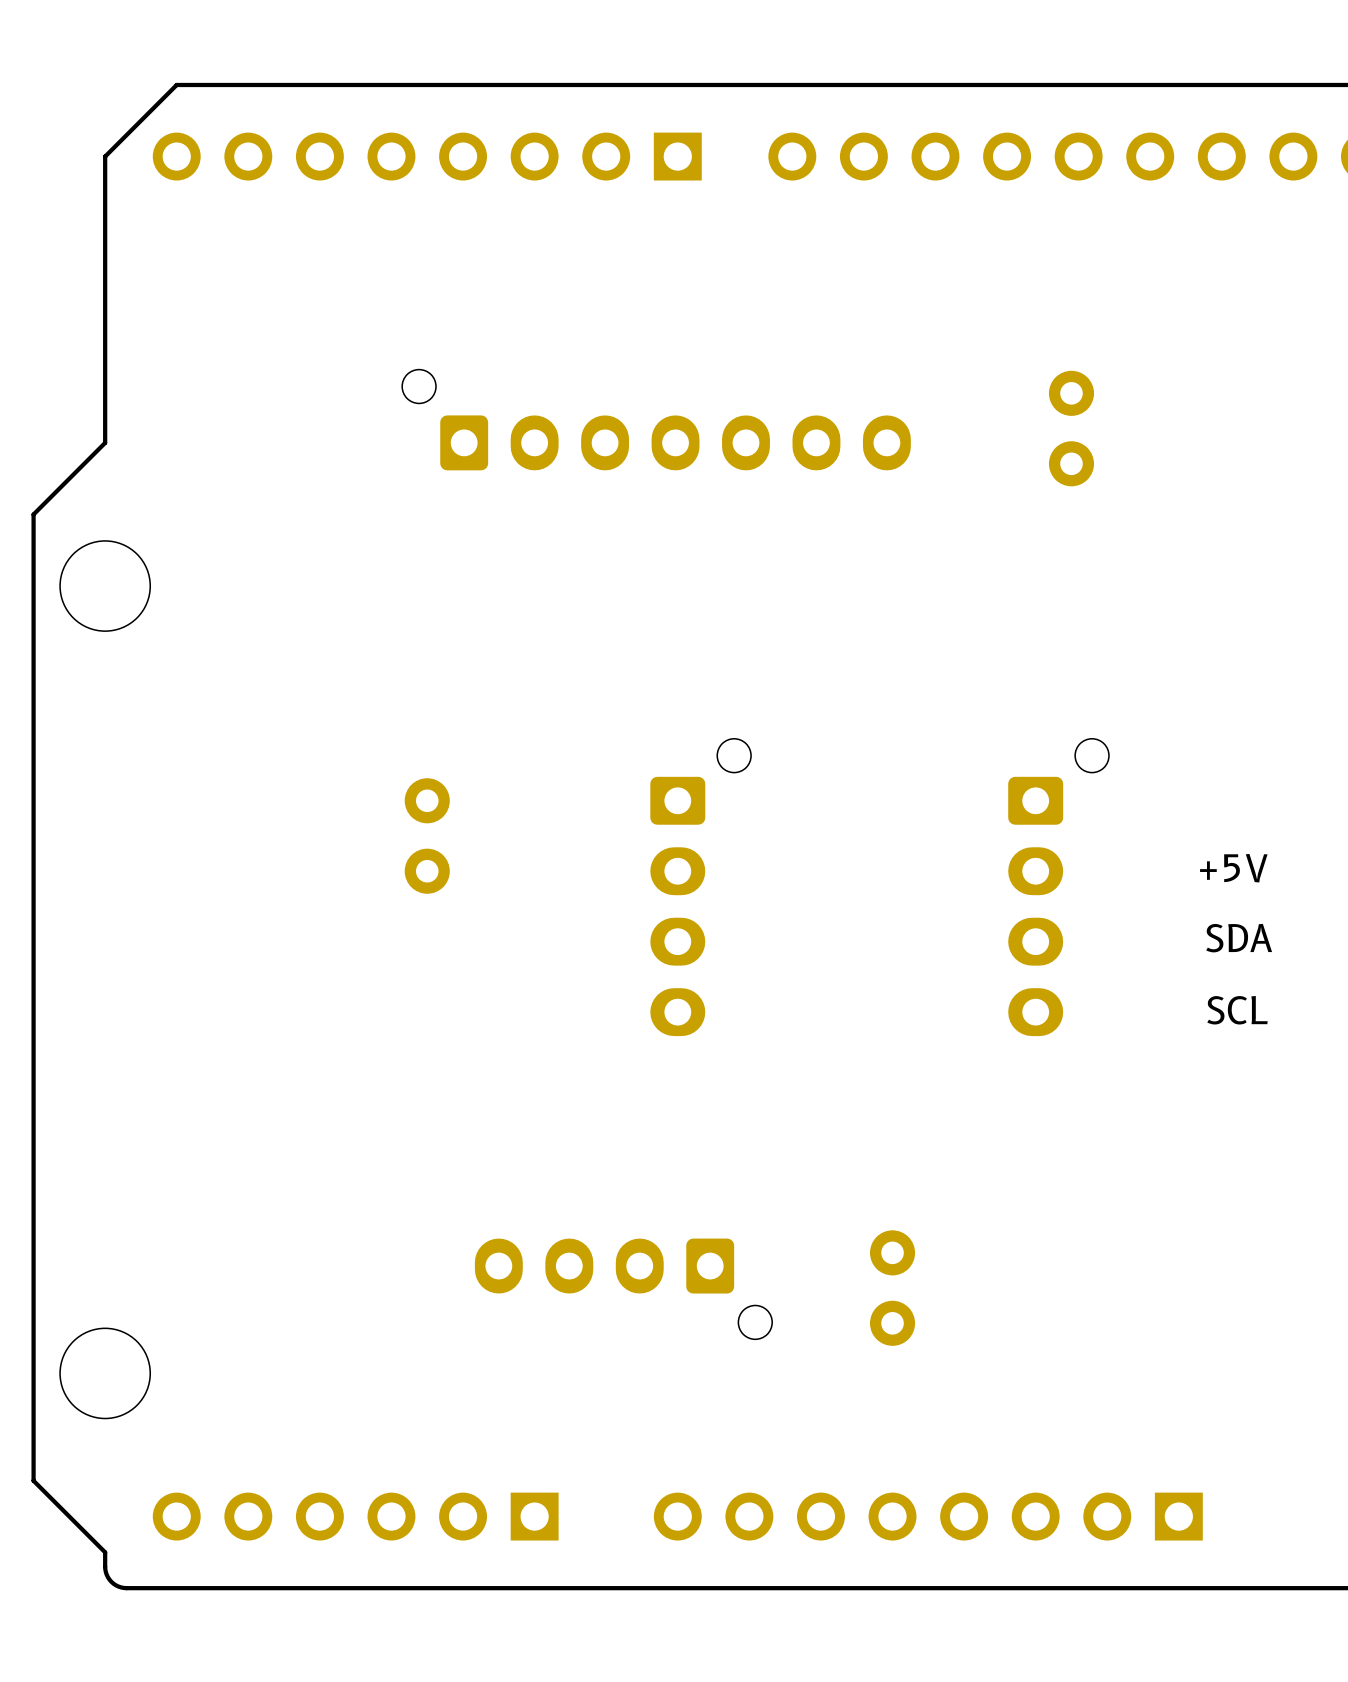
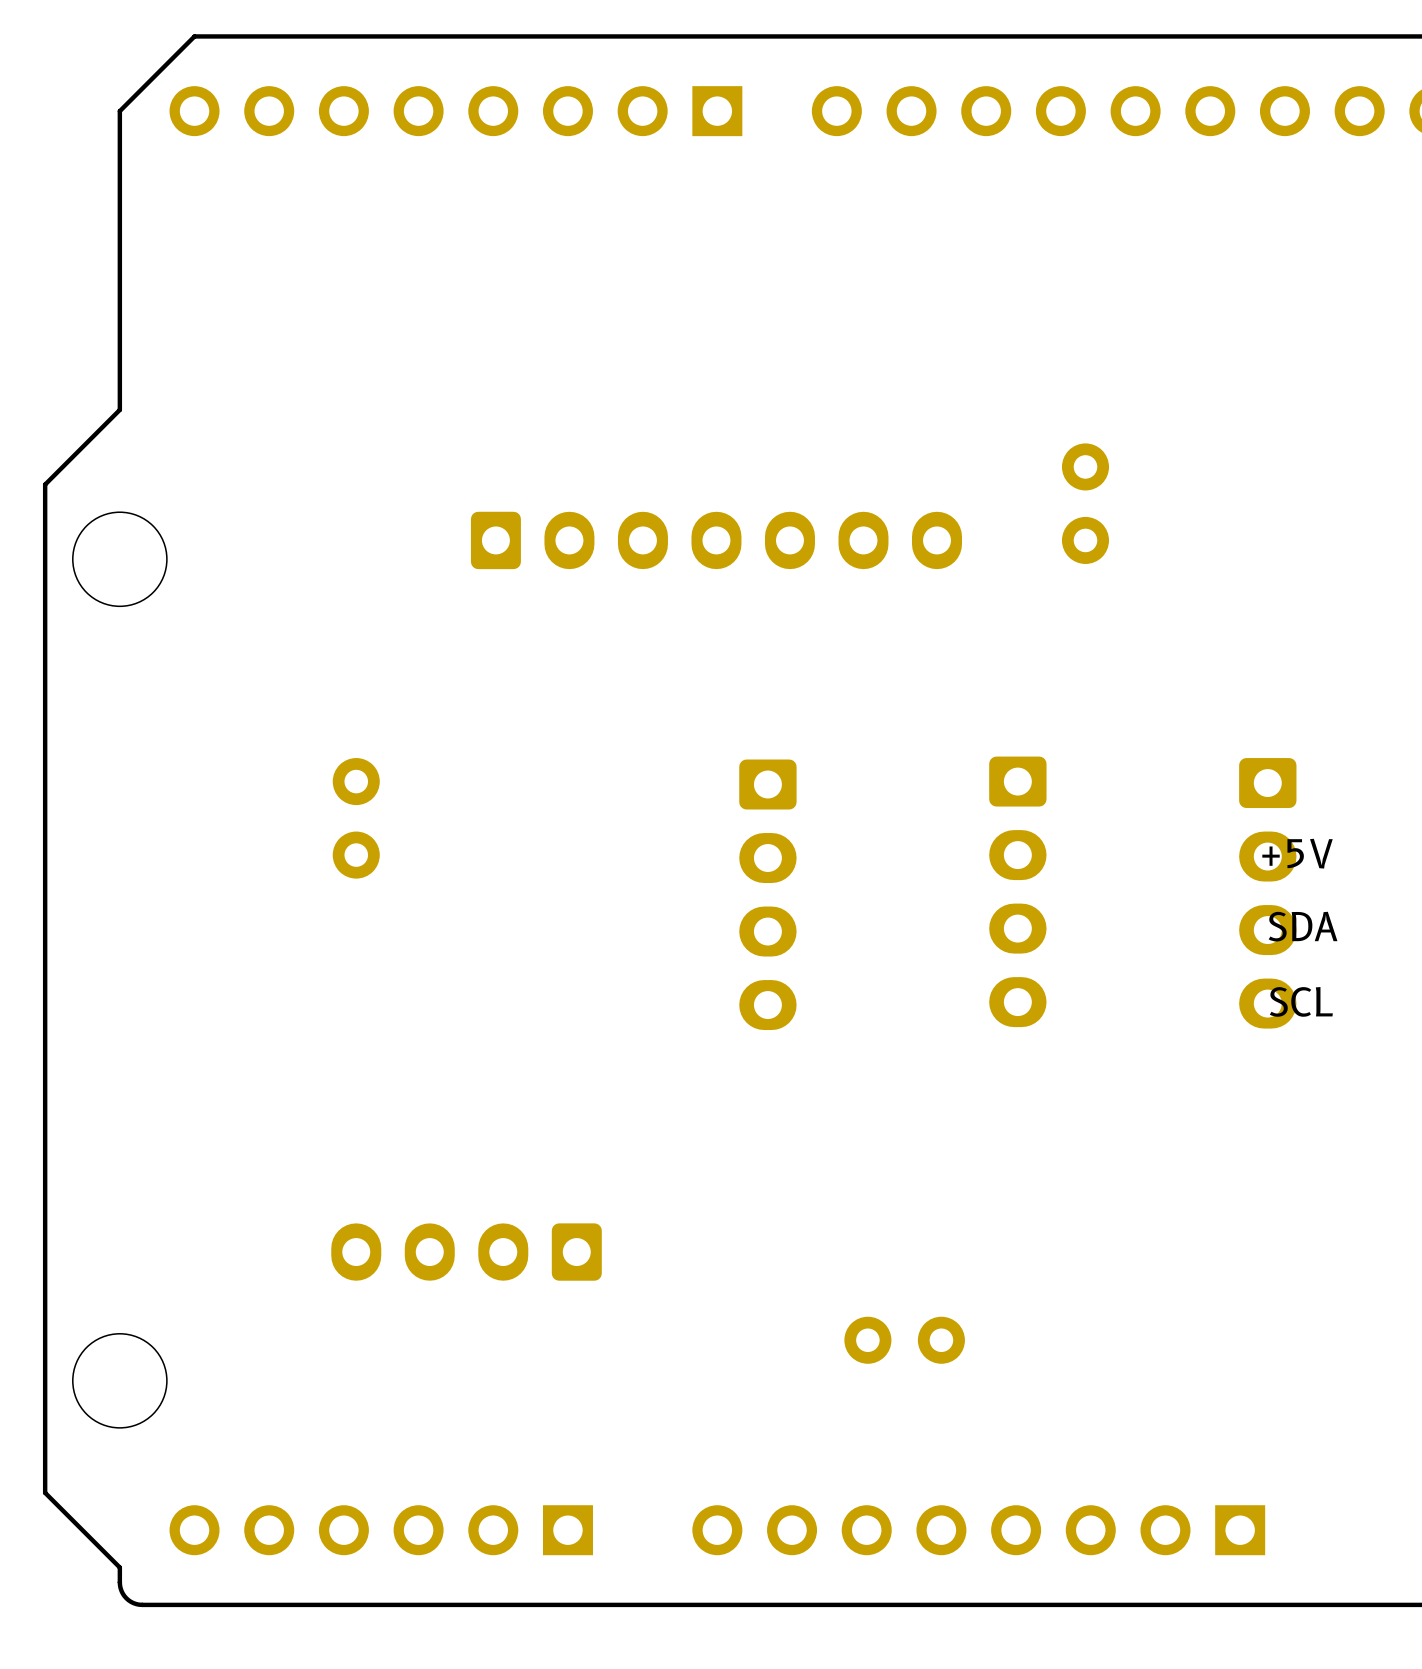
part: (656, 419) -> none
part position: (1071, 428) -> (1085, 503)
part: none -> (716, 540)
part position: (427, 836) -> (356, 818)
part: (700, 887) -> none
part: (1058, 887) -> none
part: none -> (1017, 891)
part: none -> (1267, 893)
part: none -> (767, 894)
part: none -> (466, 1252)
part: (623, 1288) -> none
part rotation: 0° (892, 1288) -> 90° clockwise (904, 1340)

